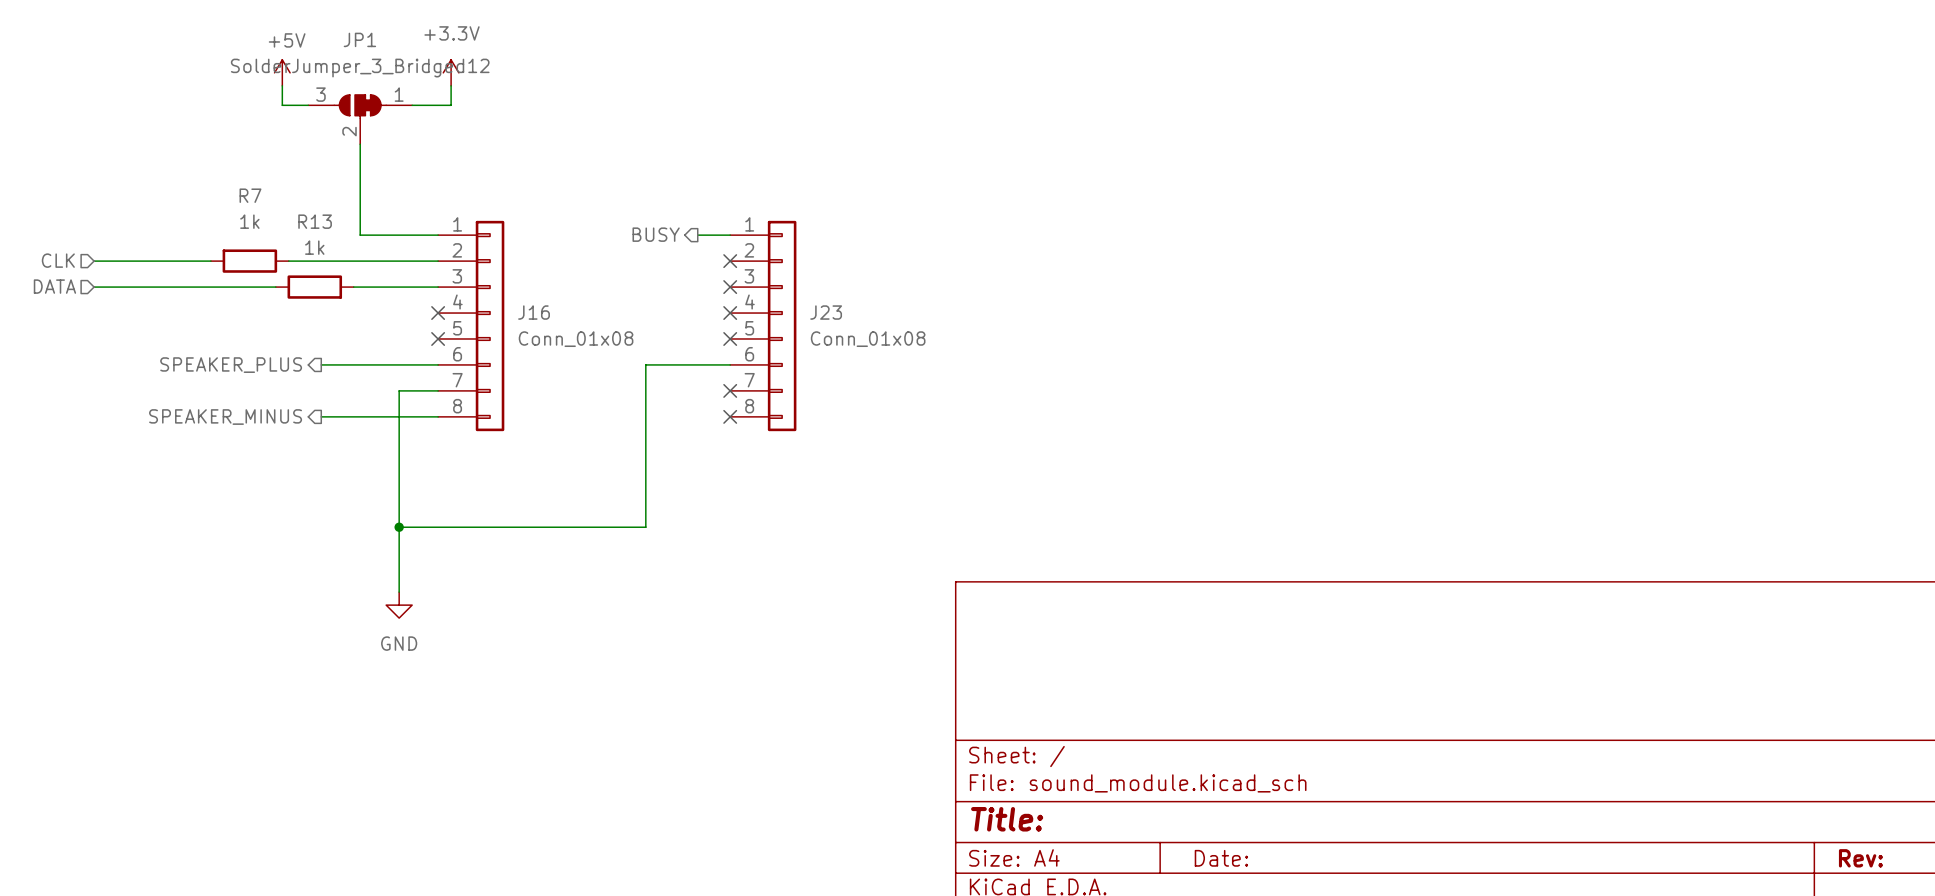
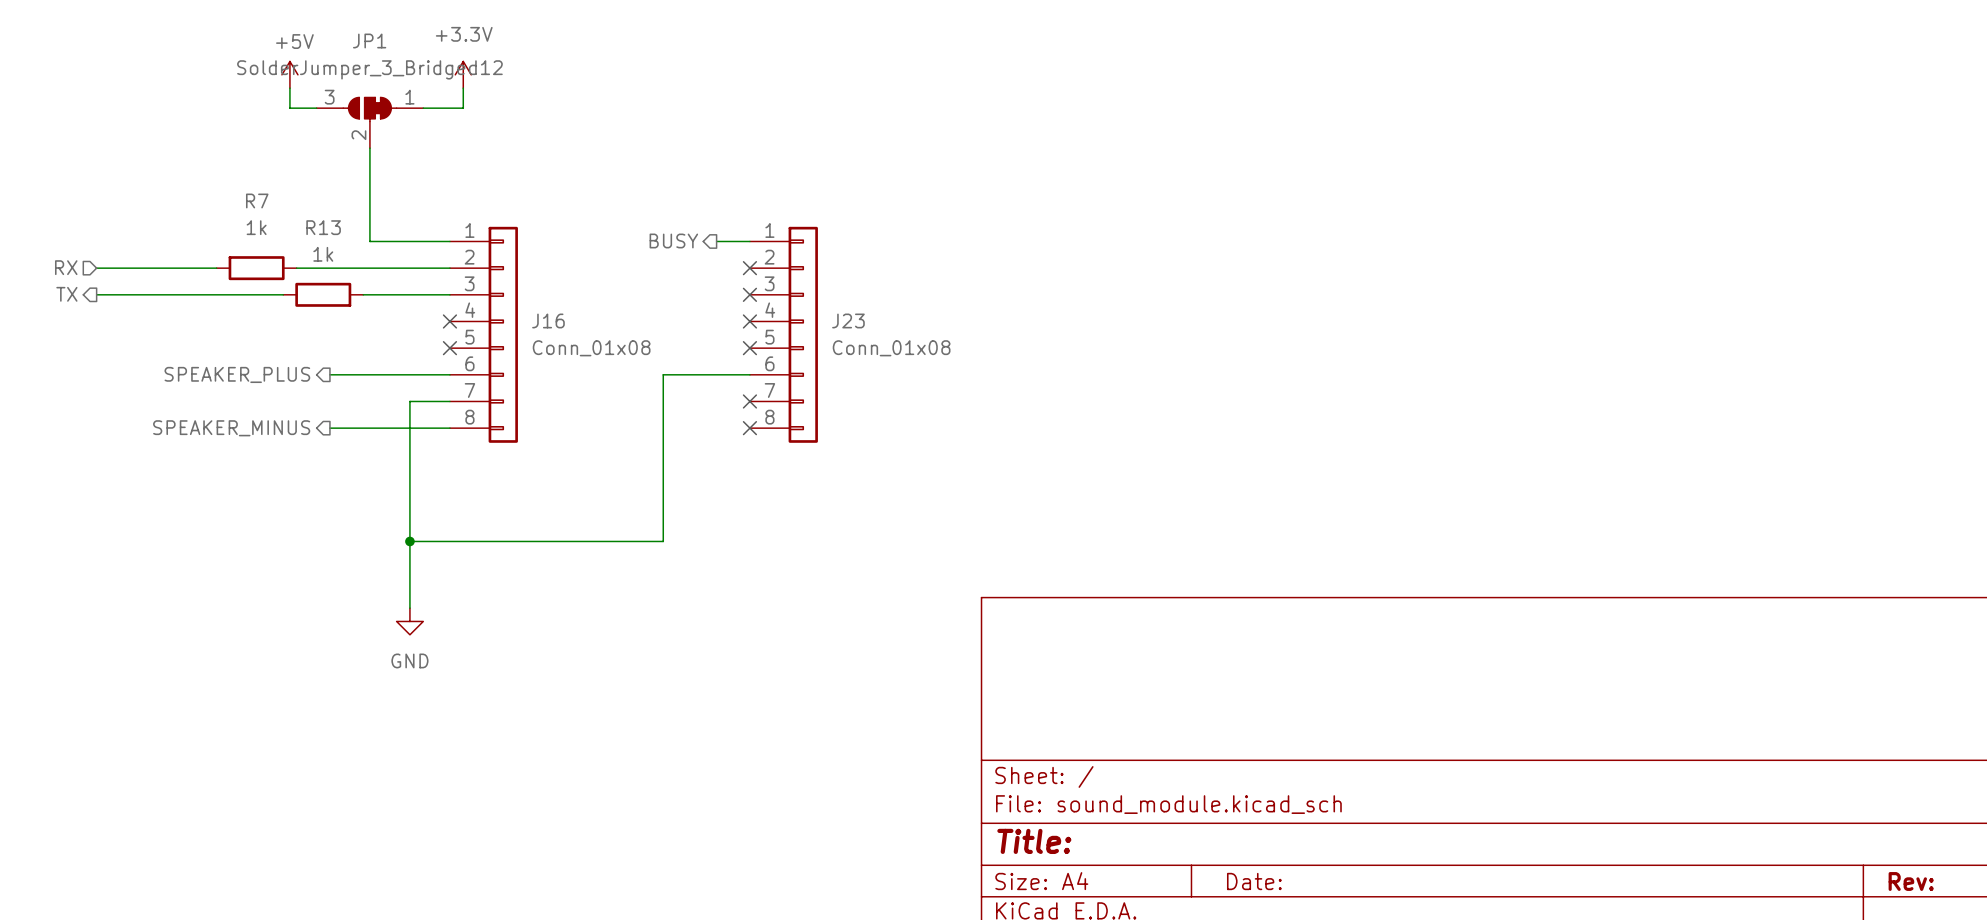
hierarchical label: CLK (58, 260) -> RX (66, 267)
hierarchical label shape: input (54, 286) -> output (66, 294)
hierarchical label: DATA (54, 286) -> TX (66, 294)

